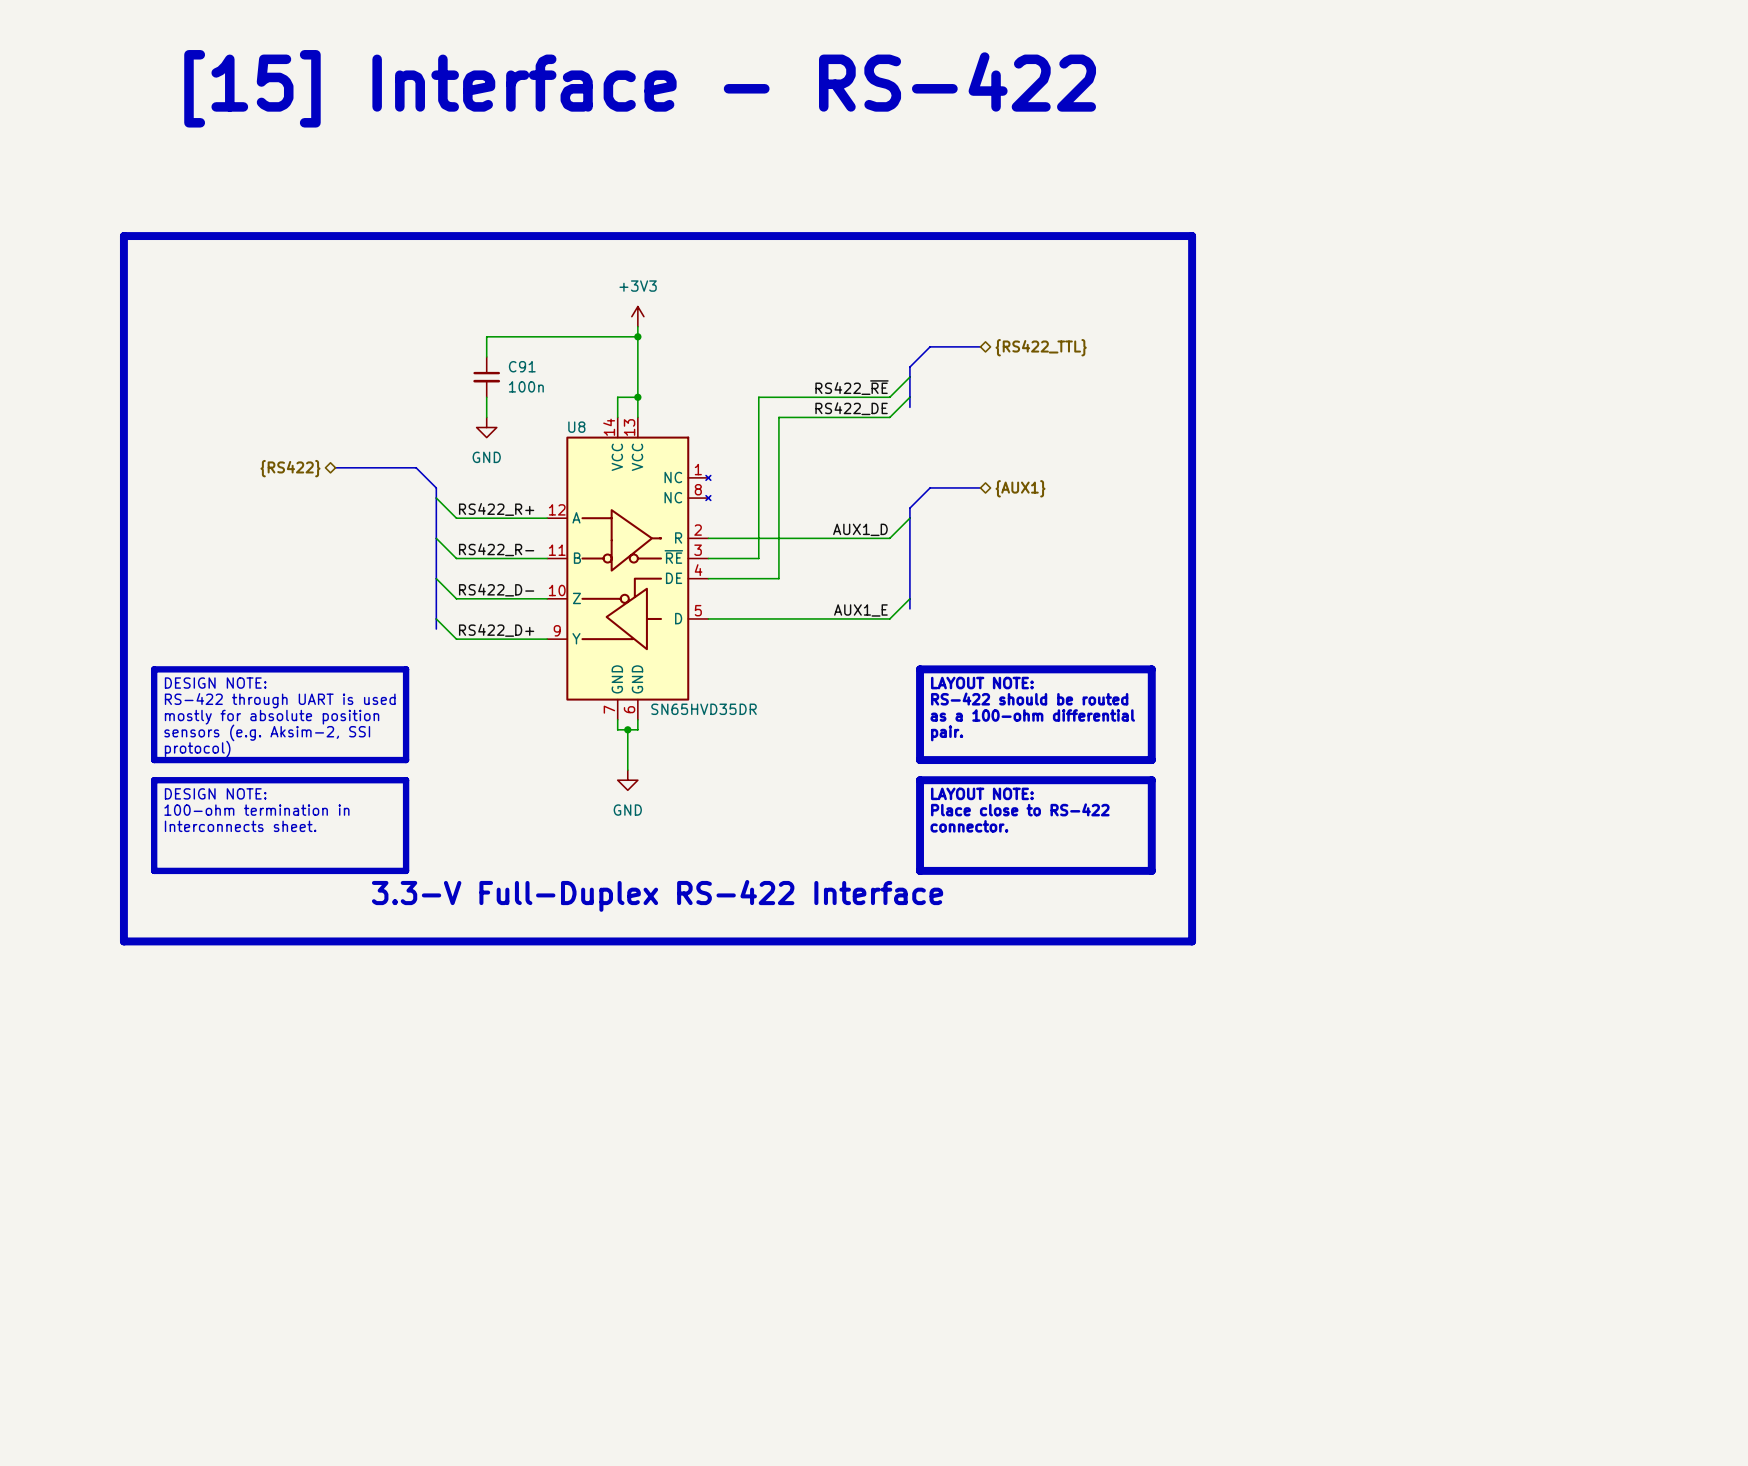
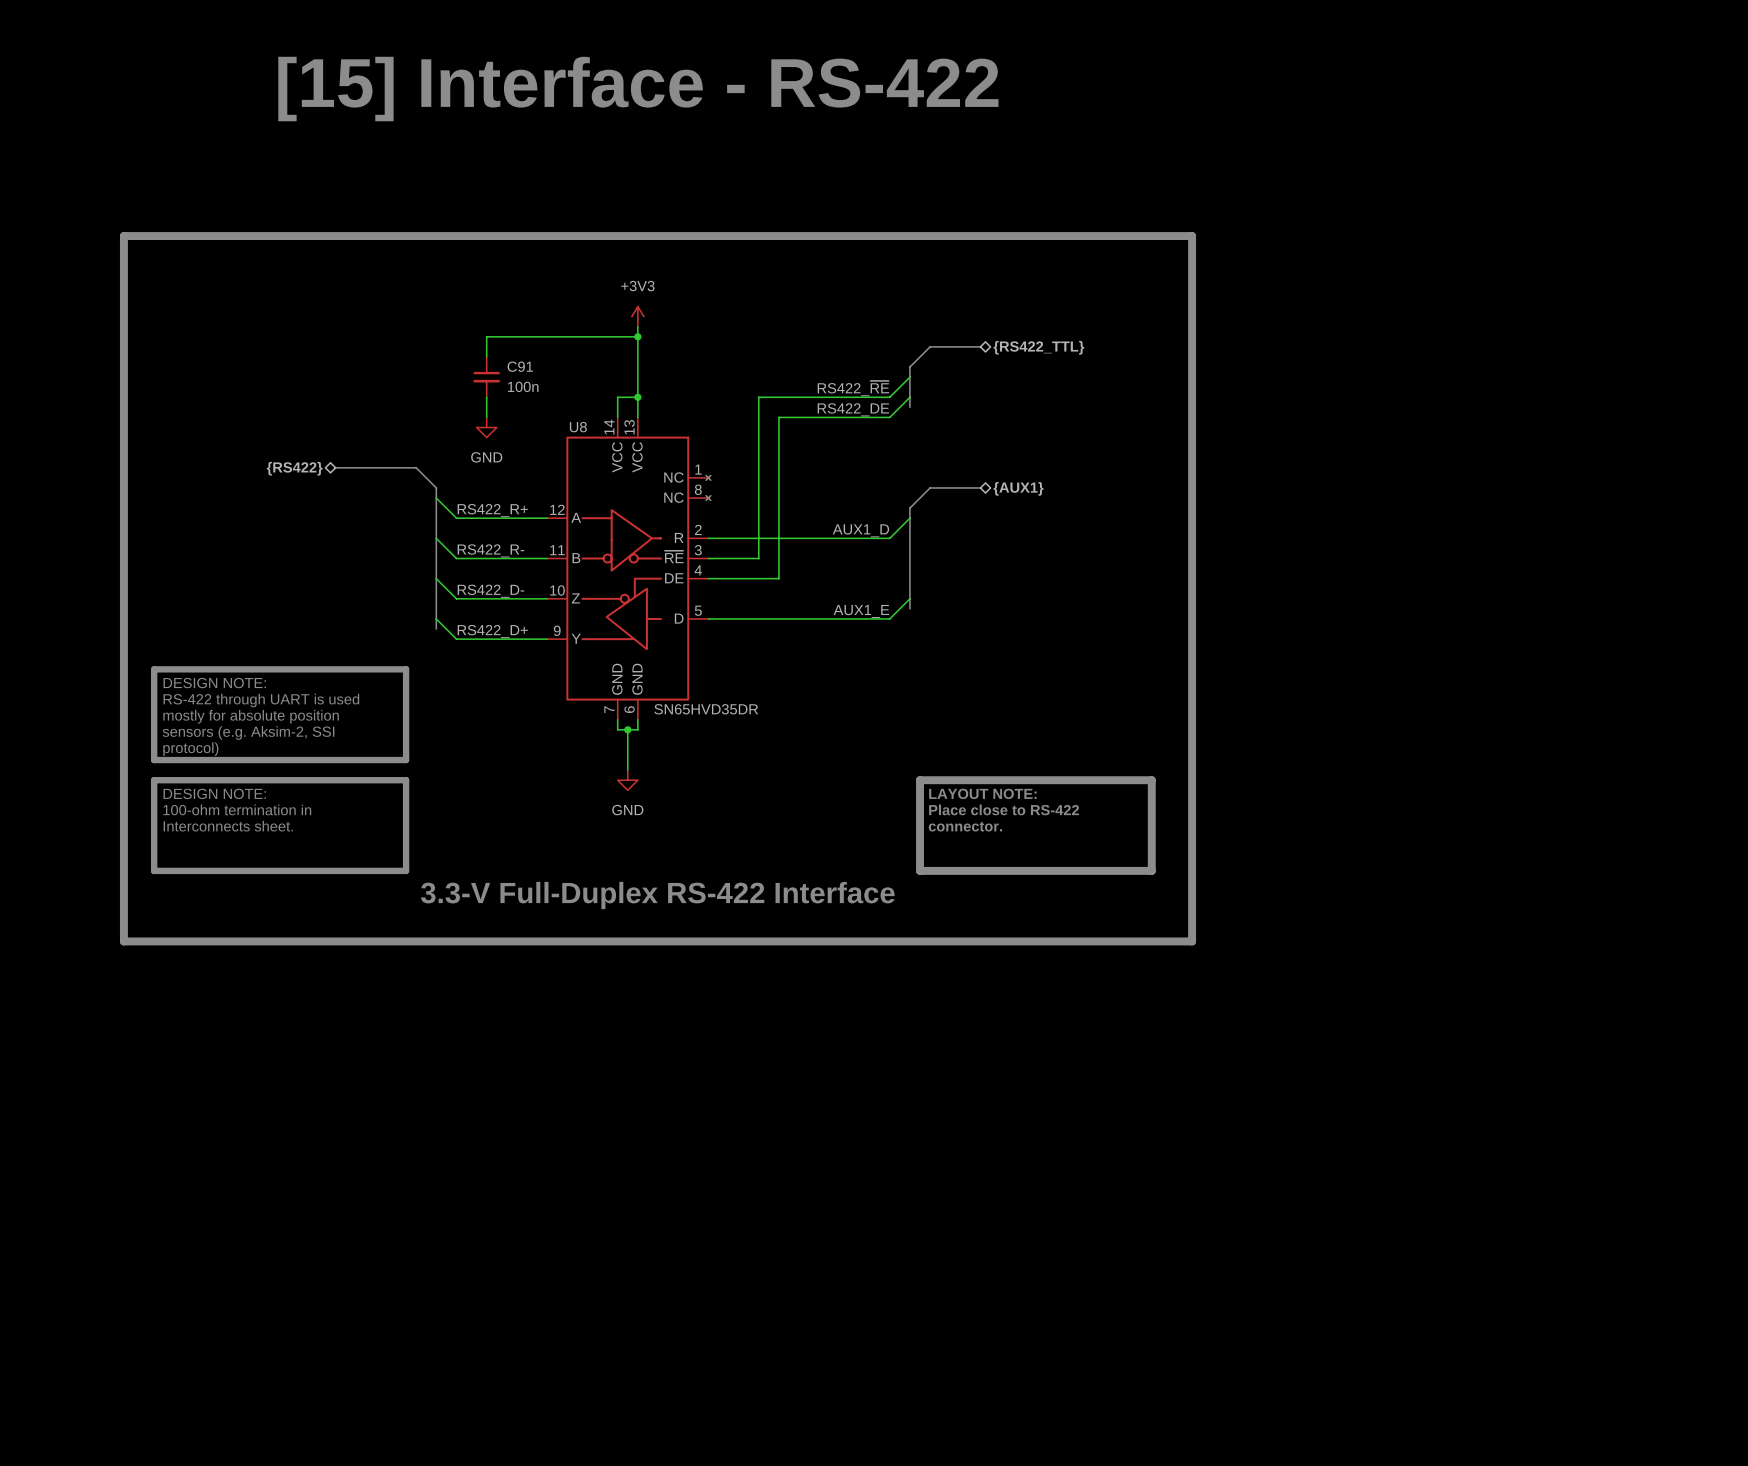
line: (920, 669) (1151, 669) (1151, 760) (920, 760) (920, 669) -> none
text: LAYOUT NOTE: (982, 683) -> none
text: RS-422 should be routed (1029, 699) -> none
text: as a 100-ohm differential (1032, 715) -> none
text: pair. (947, 733) -> none

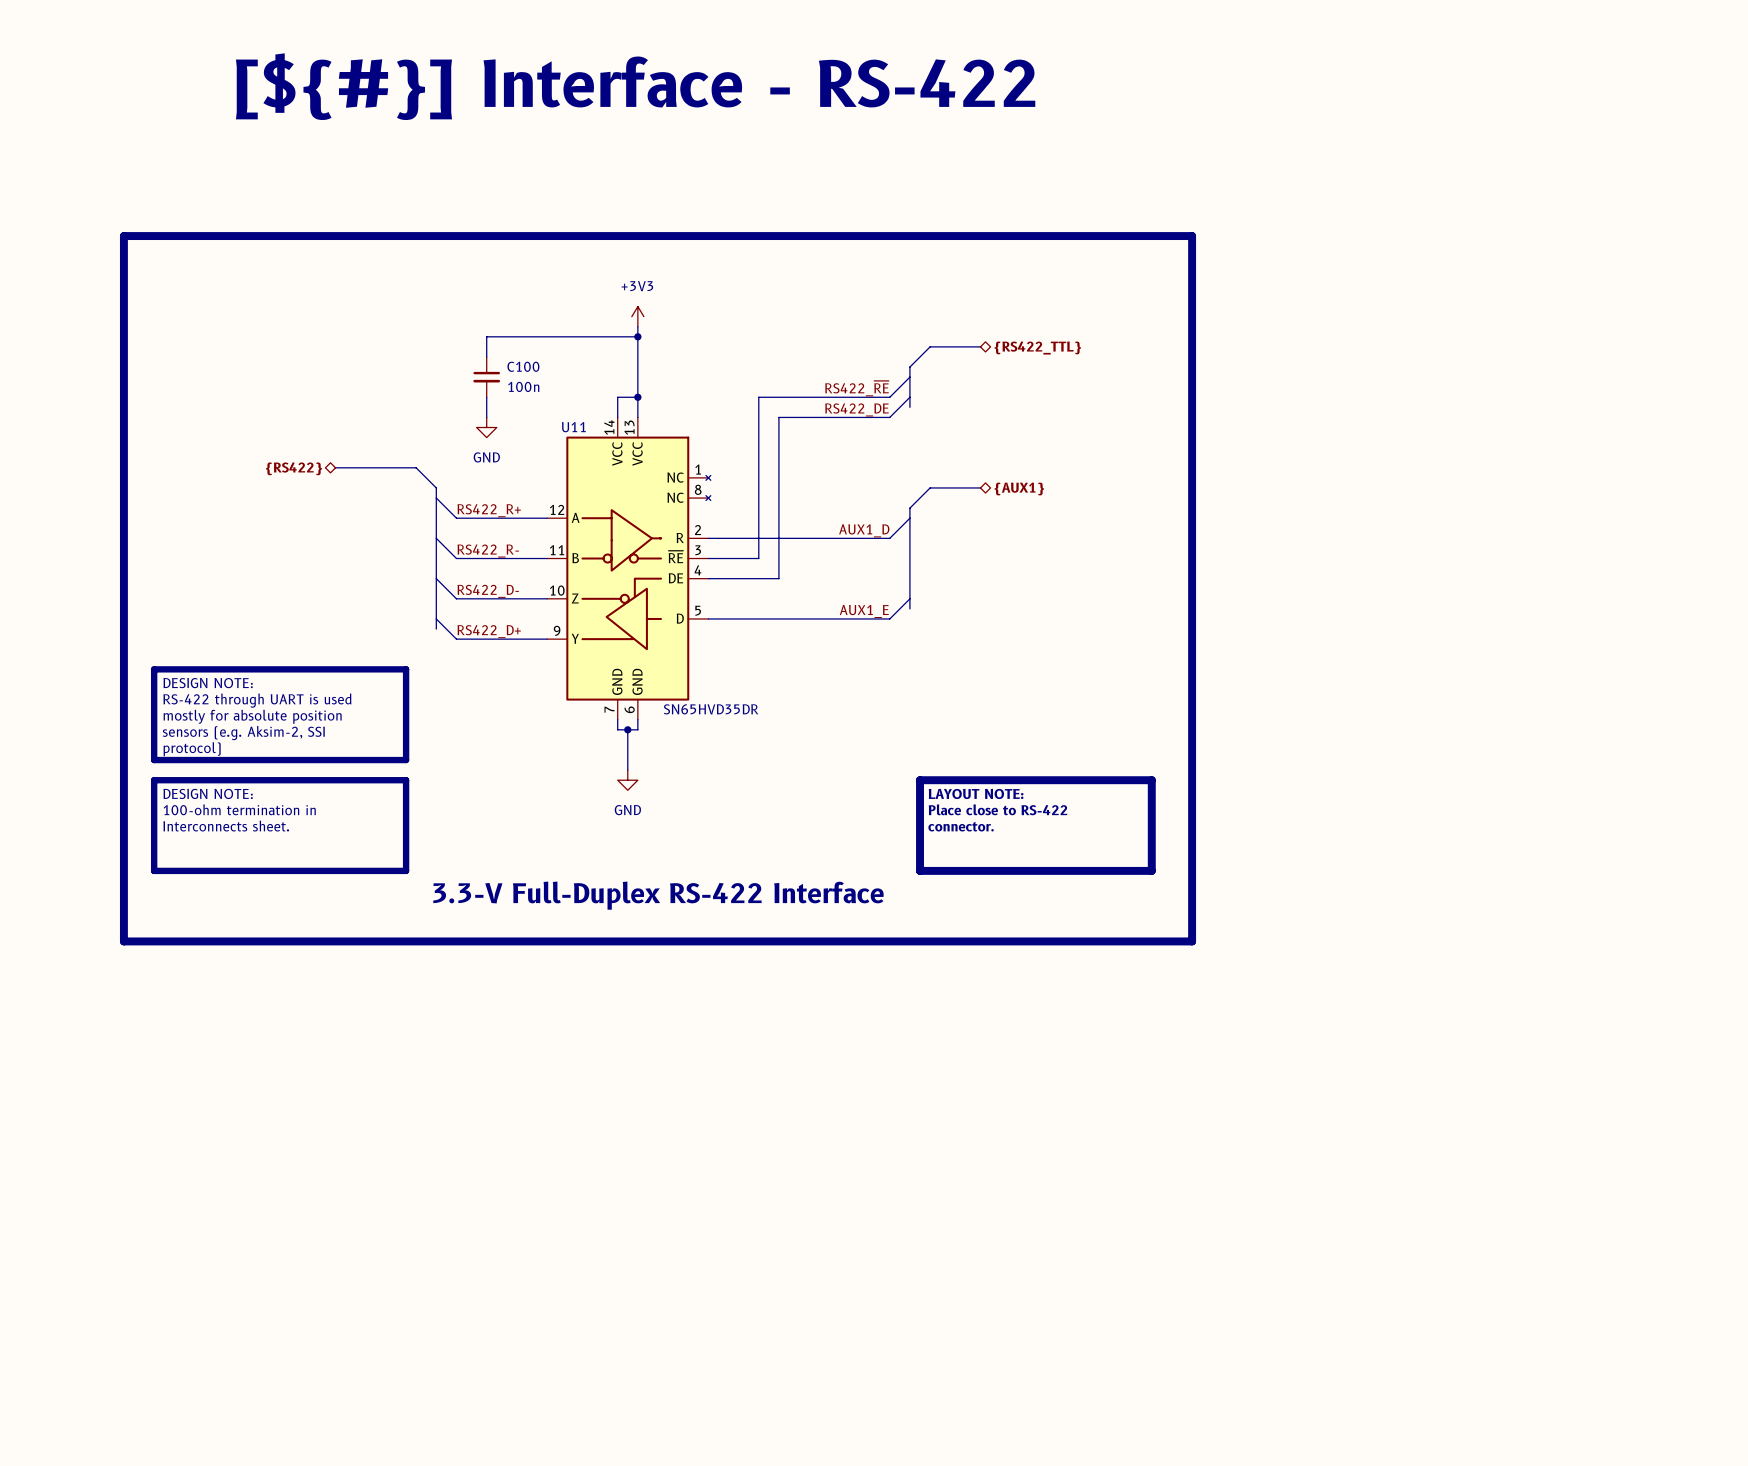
text: [15] Interface - RS-422 (638, 89) -> [${#}] Interface - RS-422 (635, 86)
C91 name: C91 (520, 366) -> C100 (523, 366)
U8 name: U8 (578, 427) -> U11 (573, 427)

